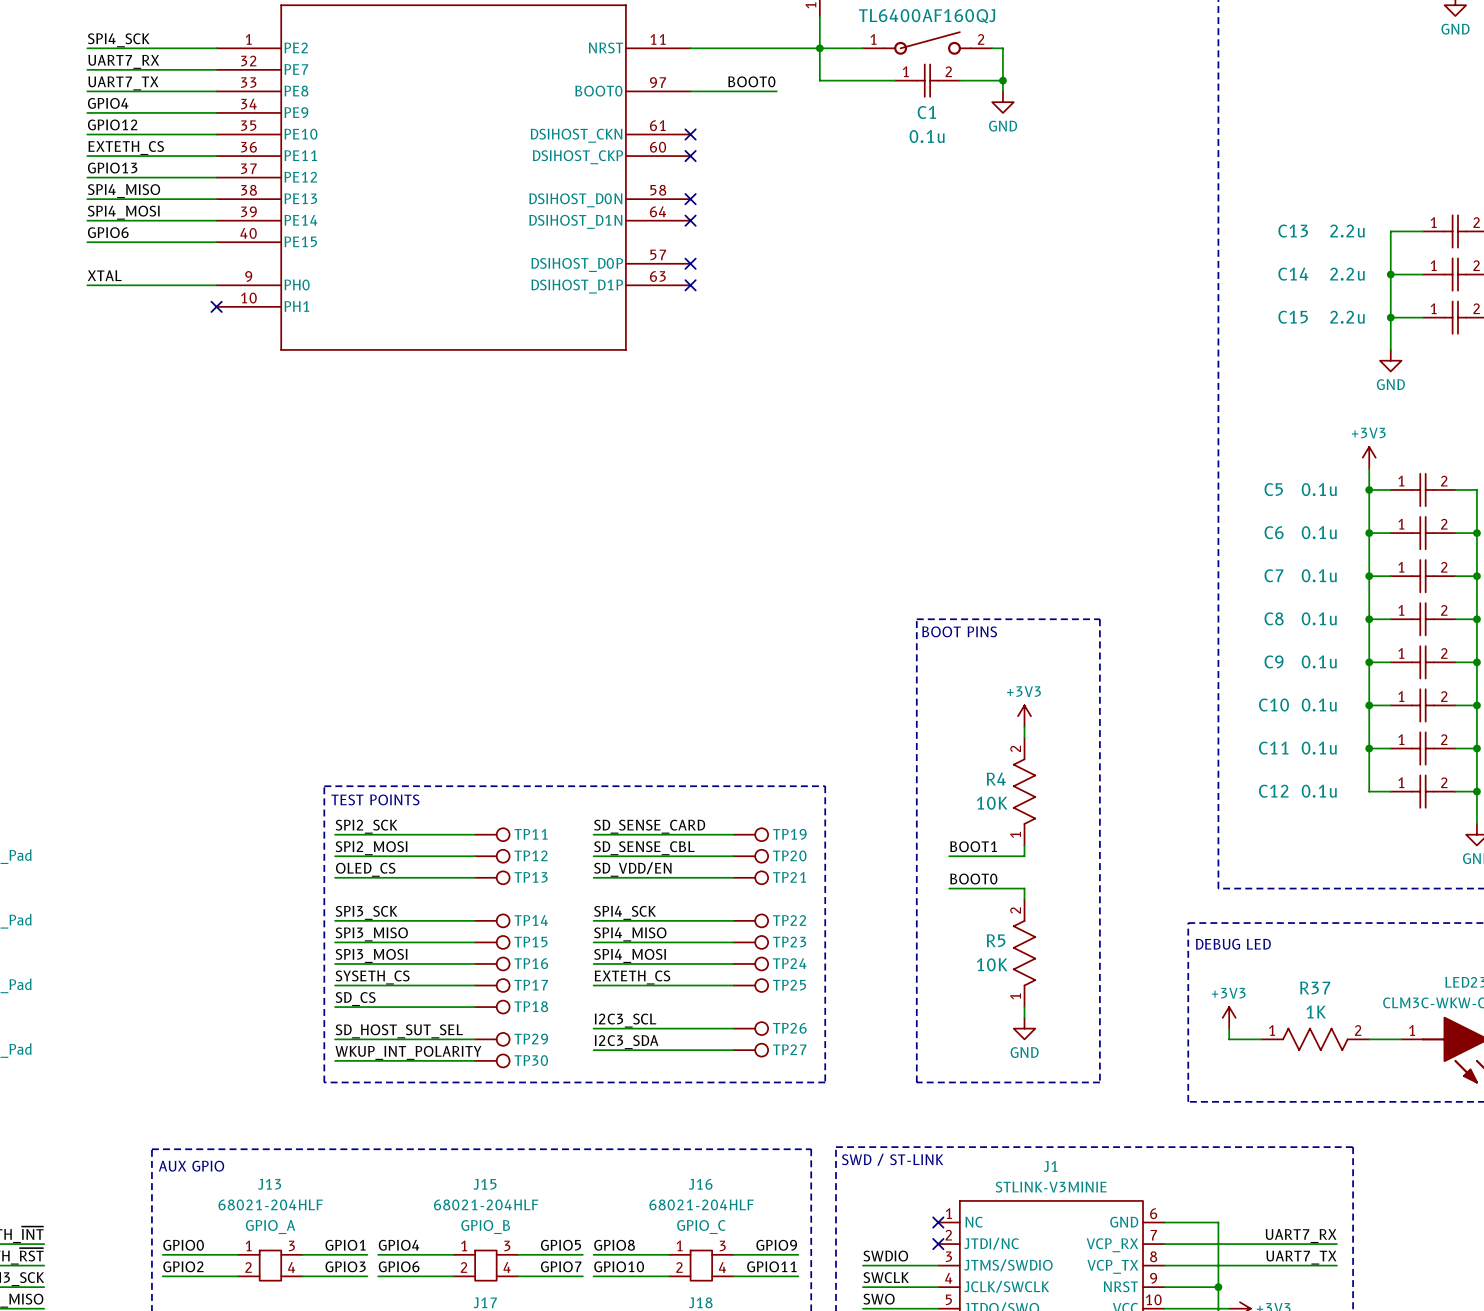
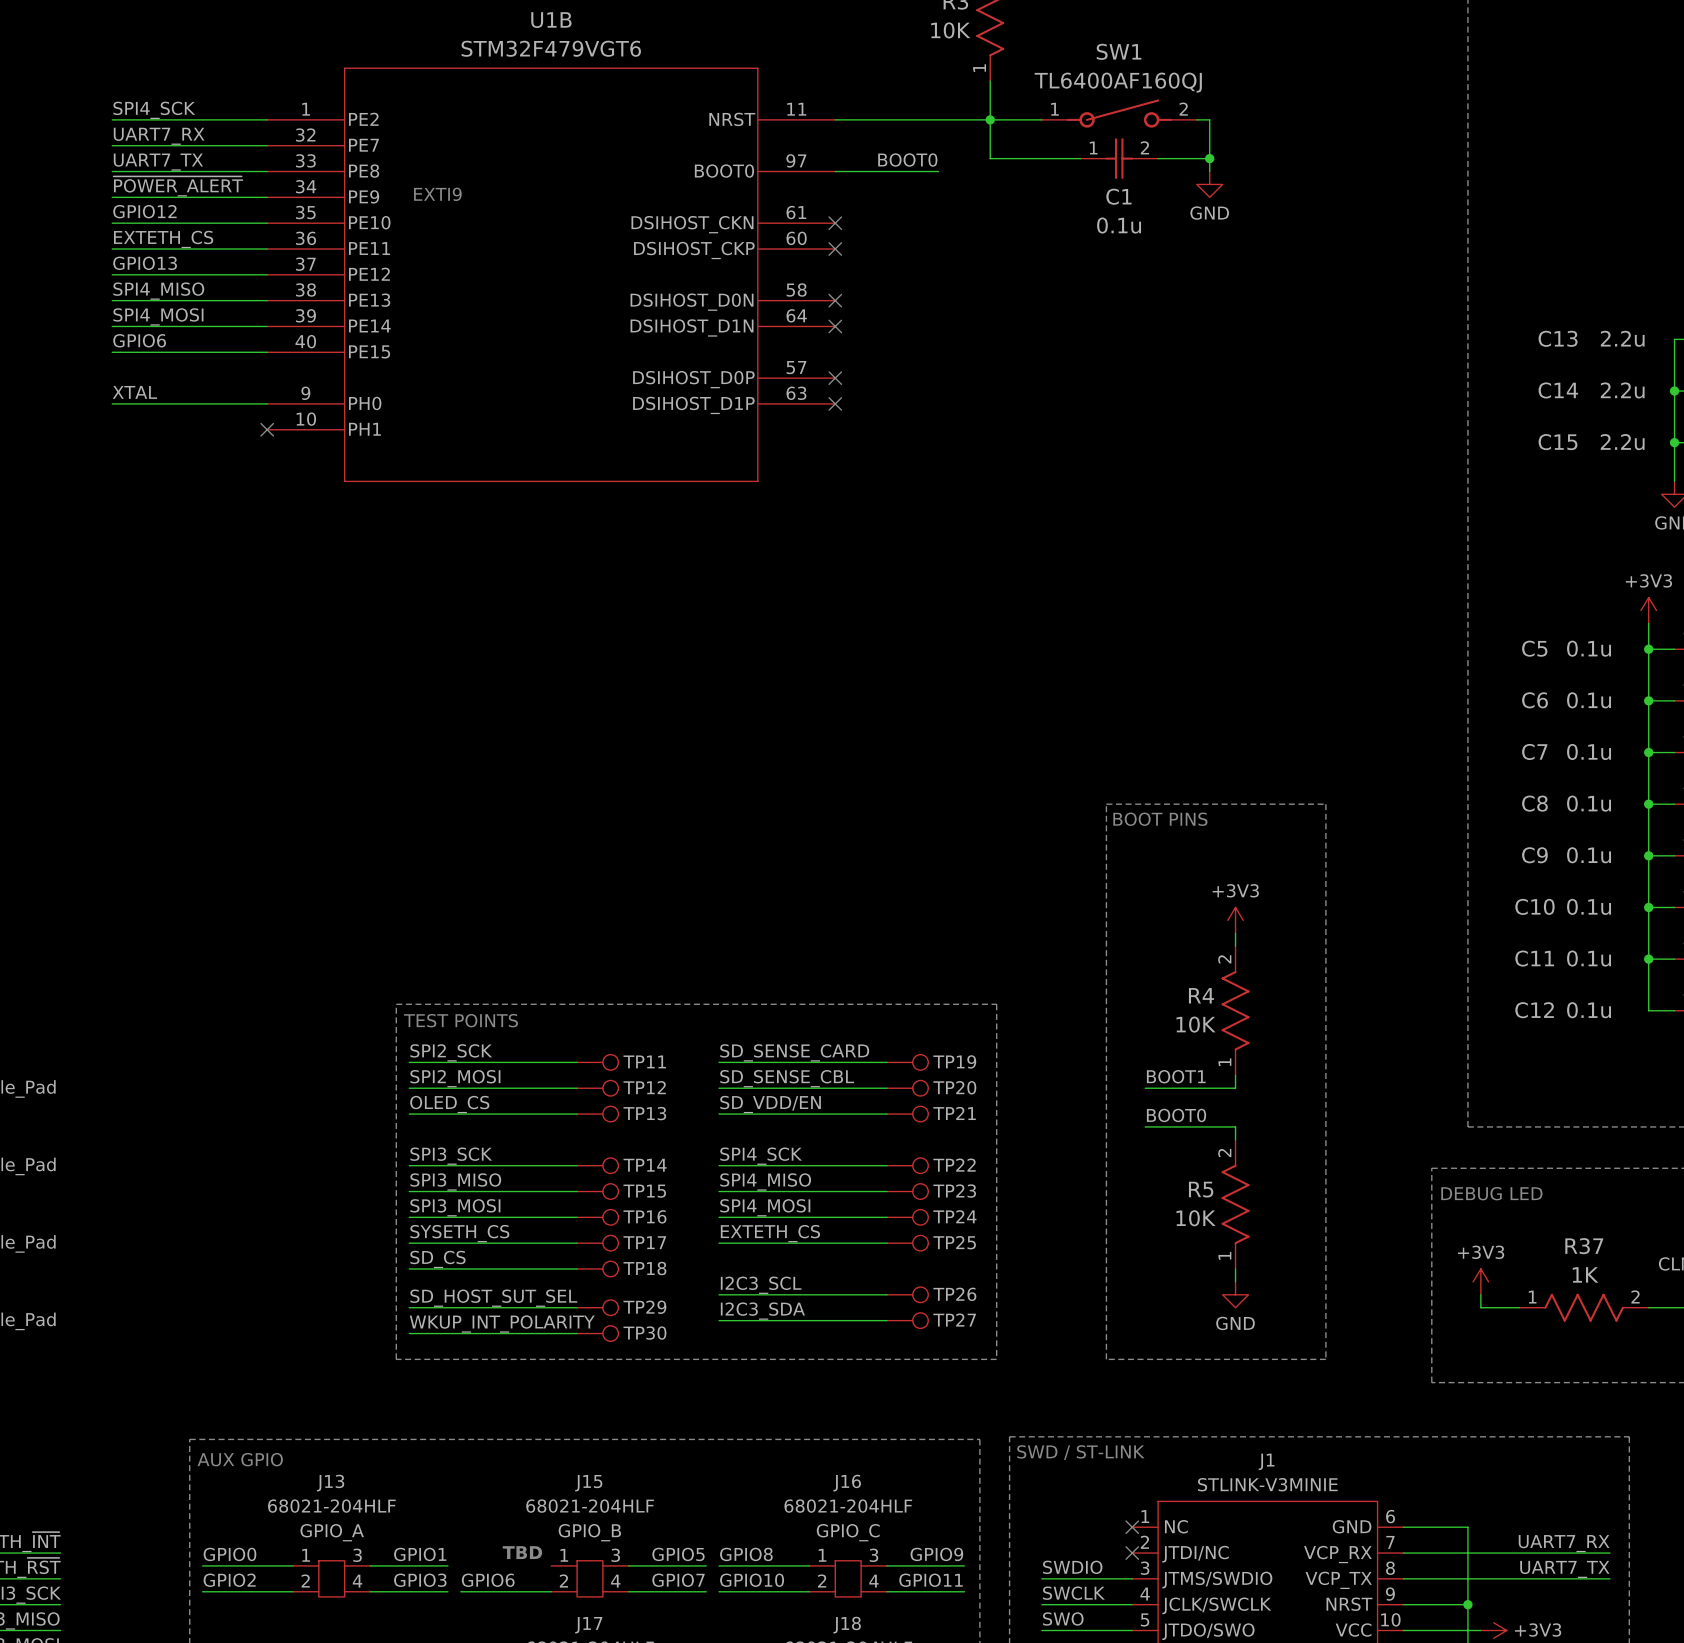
label: GPIO4 (108, 103) -> ~{POWER_ALERT} (178, 186)
text: none -> EXTI9 (437, 194)
text: none -> TBD (522, 1552)
label: GPIO4 (399, 1245) -> none
wire: (378, 1254) (453, 1254) -> none

